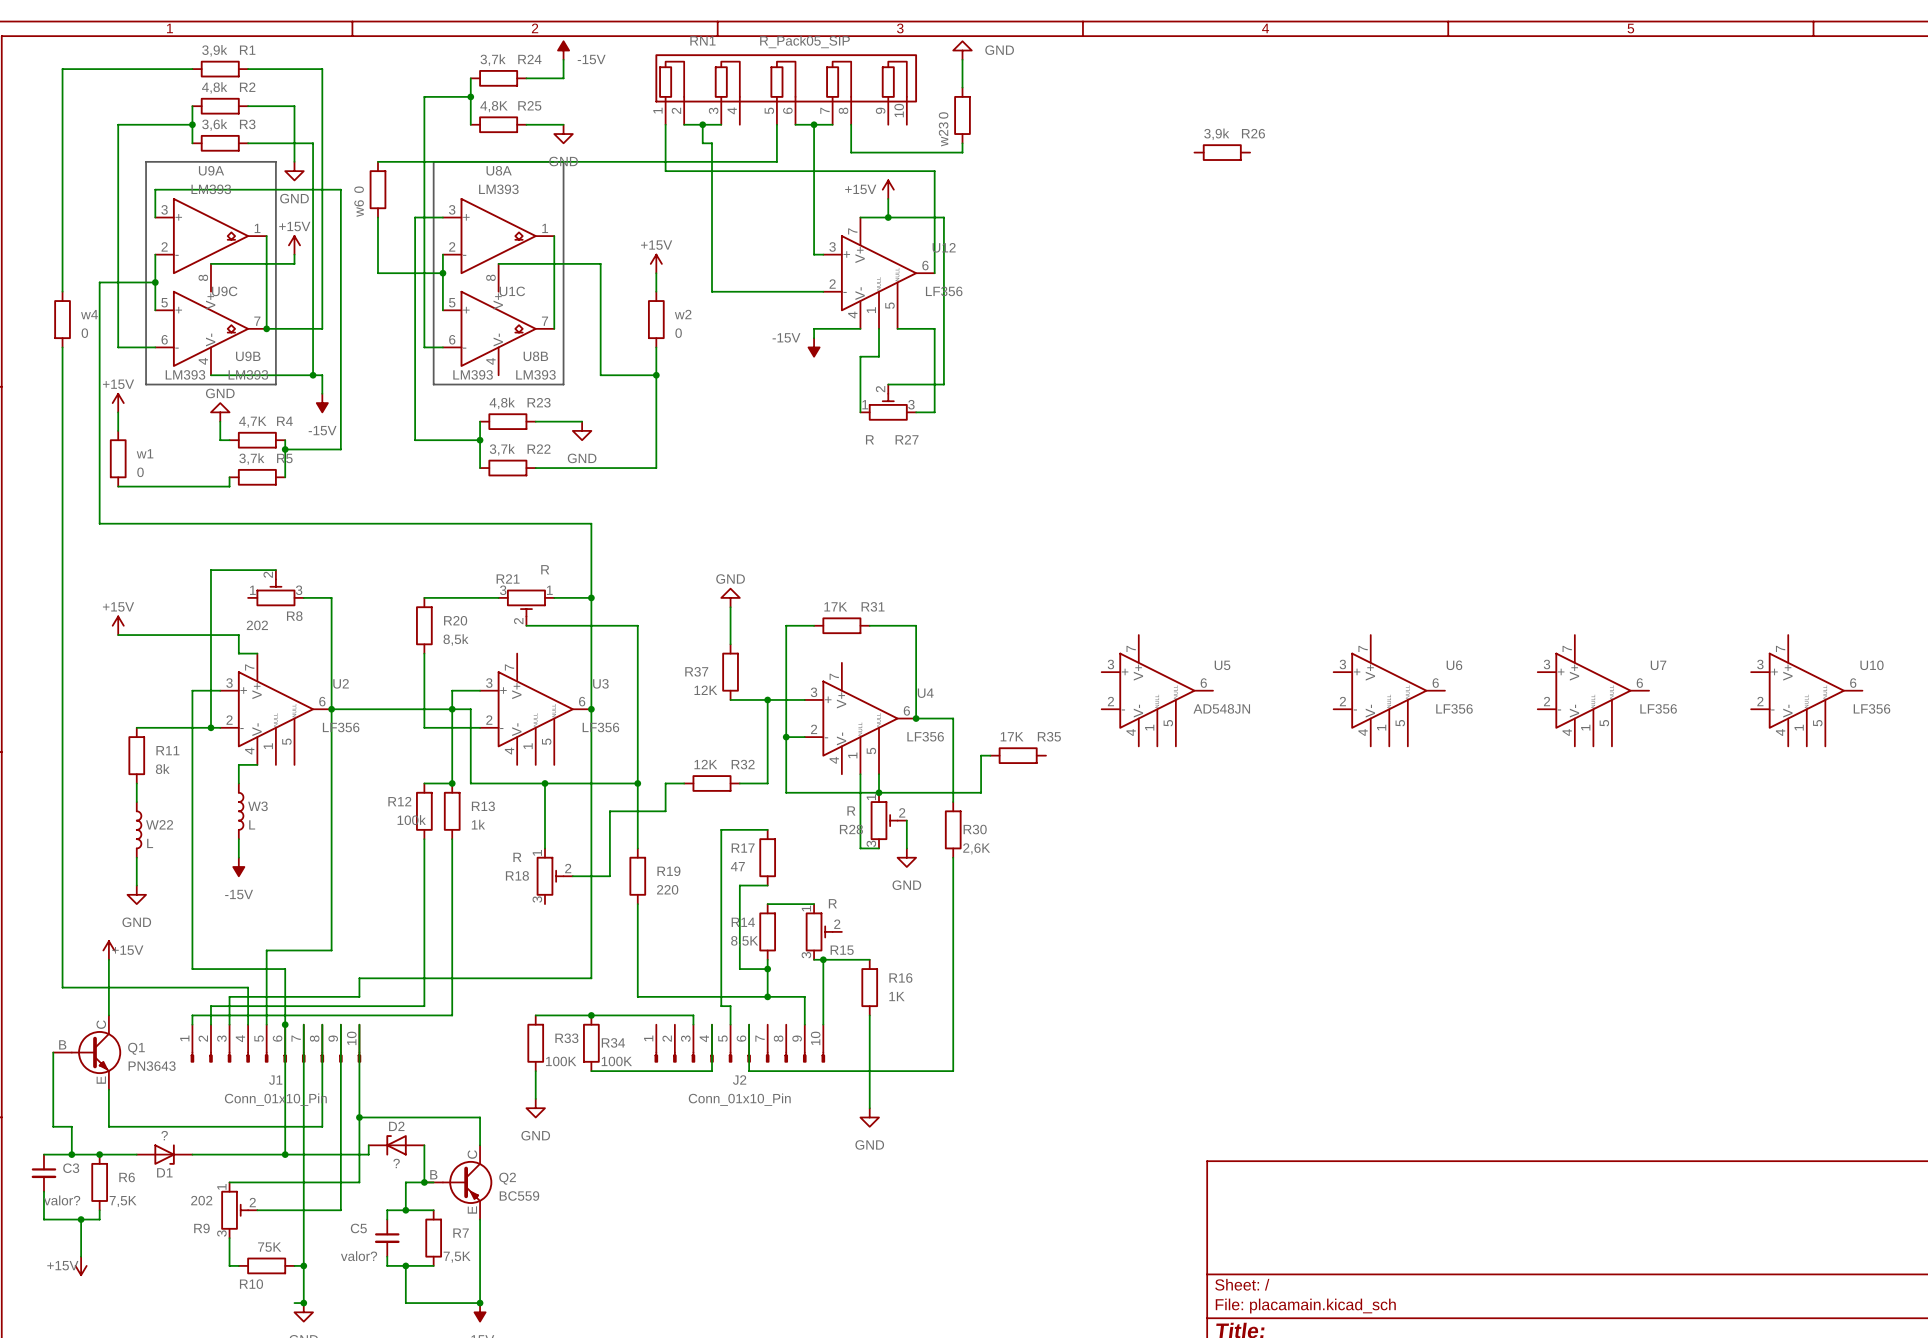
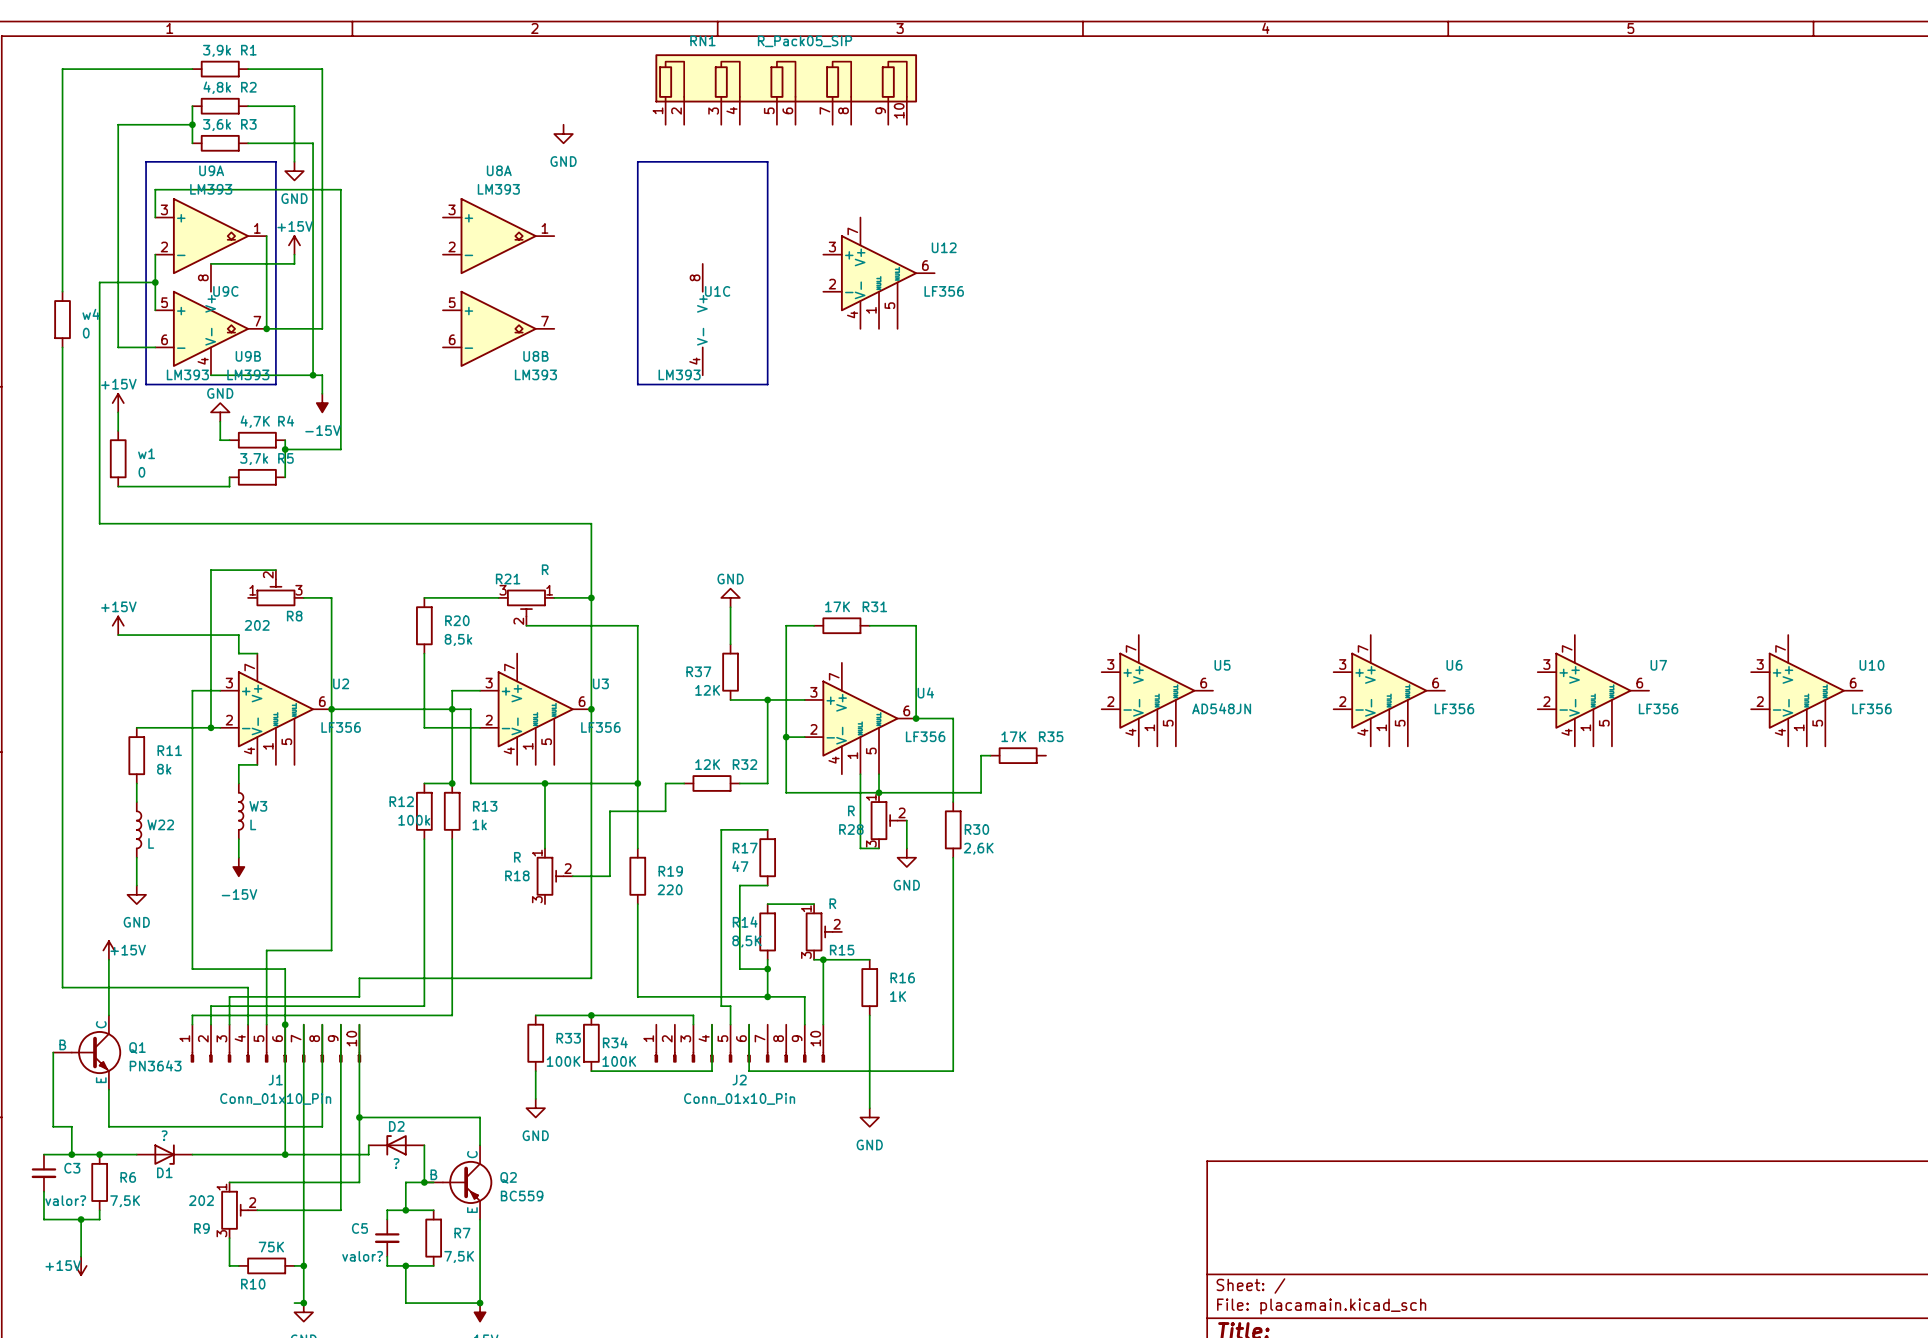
power symbol: -15V (563, 50) -> none
power symbol: GND (962, 50) -> none
wire: (563, 59) (563, 78) (526, 78) -> none
wire: (962, 59) (962, 87) -> none
wire: (470, 78) (470, 124) -> none
R24: 3,7k (498, 78) -> none
wire: (470, 96) (424, 96) (424, 347) (442, 347) -> none
junction: (470, 96) -> none
w23: 0 (962, 115) -> none
R25: 4,8K (498, 124) -> none
wire: (526, 124) (563, 124) -> none
wire: (665, 124) (665, 171) (934, 171) (934, 273) -> none
wire: (684, 124) (721, 124) -> none
wire: (702, 124) (702, 143) (712, 143) (712, 291) (823, 291) -> none
junction: (702, 124) -> none
wire: (776, 124) (776, 161) (377, 161) -> none
wire: (795, 124) (832, 124) -> none
wire: (814, 124) (814, 254) (823, 254) -> none
junction: (814, 124) -> none
wire: (851, 124) (851, 152) (962, 152) (962, 143) -> none
R26: 3,9k (1222, 152) -> none
line: (433, 161) (563, 161) (563, 384) (433, 384) (433, 161) -> none
line: none -> (637, 161) (767, 161) (767, 384) (637, 384) (637, 161)
w6: 0 (377, 189) -> none
power symbol: +15V (888, 189) -> none
wire: (888, 198) (888, 217) -> none
wire: (377, 217) (377, 273) (442, 273) -> none
wire: (442, 217) (415, 217) (415, 440) (480, 440) -> none
wire: (860, 217) (943, 217) (943, 384) (888, 384) -> none
junction: (888, 217) -> none
wire: (554, 236) (554, 328) -> none
wire: (442, 254) (442, 310) -> none
wire: (498, 263) (600, 263) (600, 375) (656, 375) -> none
power symbol: +15V (656, 263) -> none
junction: (442, 273) -> none
wire: (656, 273) (656, 291) -> none
U1C position: (498, 319) -> (702, 319)
w2: 0 (656, 319) -> none
wire: (860, 328) (814, 328) (814, 338) -> none
wire: (879, 328) (879, 356) (860, 356) (860, 412) -> none
wire: (897, 328) (934, 328) (934, 412) (916, 412) -> none
wire: (656, 347) (656, 468) (535, 468) -> none
power symbol: -15V (814, 347) -> none
junction: (656, 375) -> none
R27: R (888, 402) -> none
wire: (480, 421) (480, 468) -> none
R23: 4,8k (507, 421) -> none
wire: (535, 421) (582, 421) -> none
power symbol: GND (582, 430) -> none
junction: (480, 440) -> none
R22: 3,7k (507, 468) -> none

